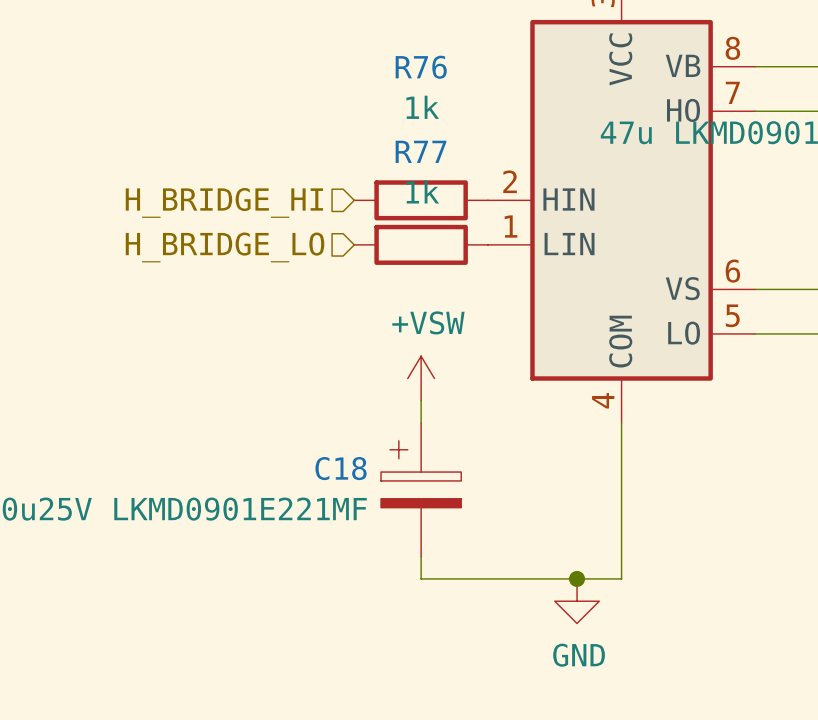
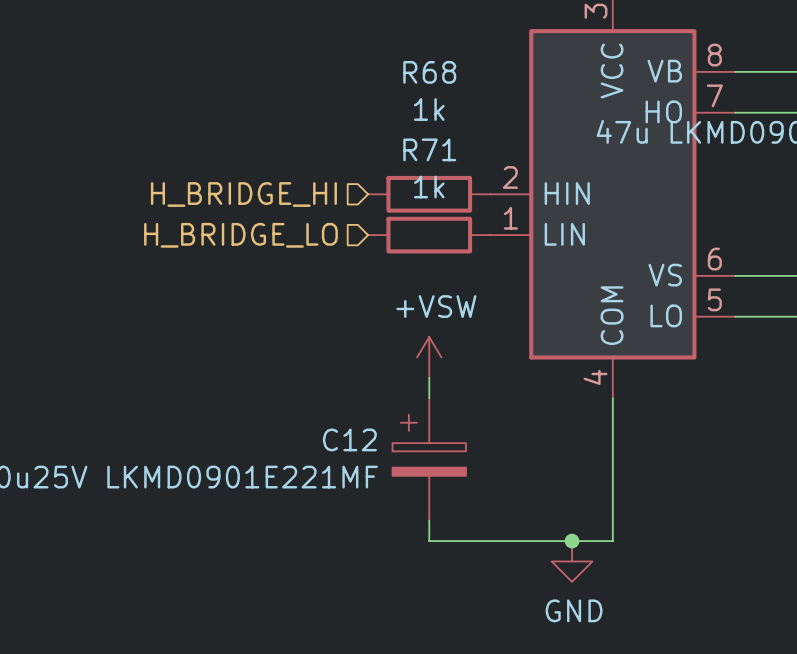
R76 name: R76 (421, 67) -> R68 (429, 72)
R77 name: R77 (421, 151) -> R71 (429, 149)
C18 name: C18 (341, 468) -> C12 (349, 439)

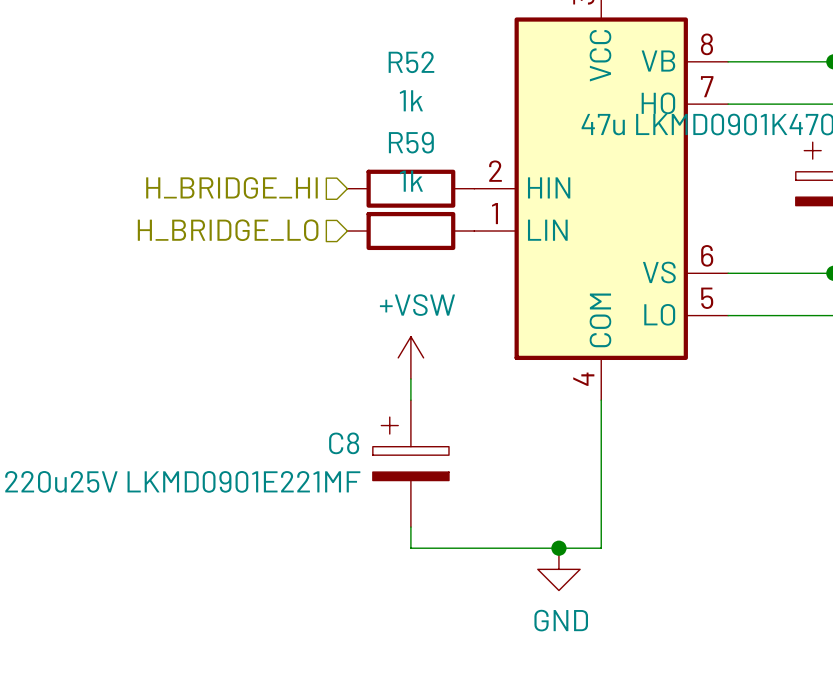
R68 name: R68 (429, 72) -> R52 (411, 62)
R71 name: R71 (429, 149) -> R59 (411, 142)
C12 name: C12 (349, 439) -> C8 (344, 443)

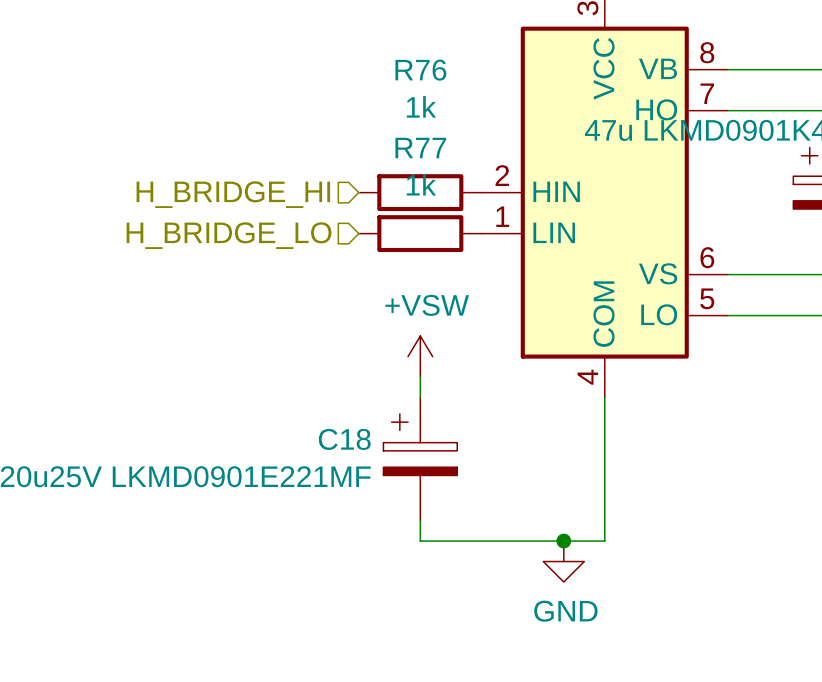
R52 name: R52 (411, 62) -> R76 (420, 70)
R59 name: R59 (411, 142) -> R77 (420, 148)
C8 name: C8 (344, 443) -> C18 (344, 439)

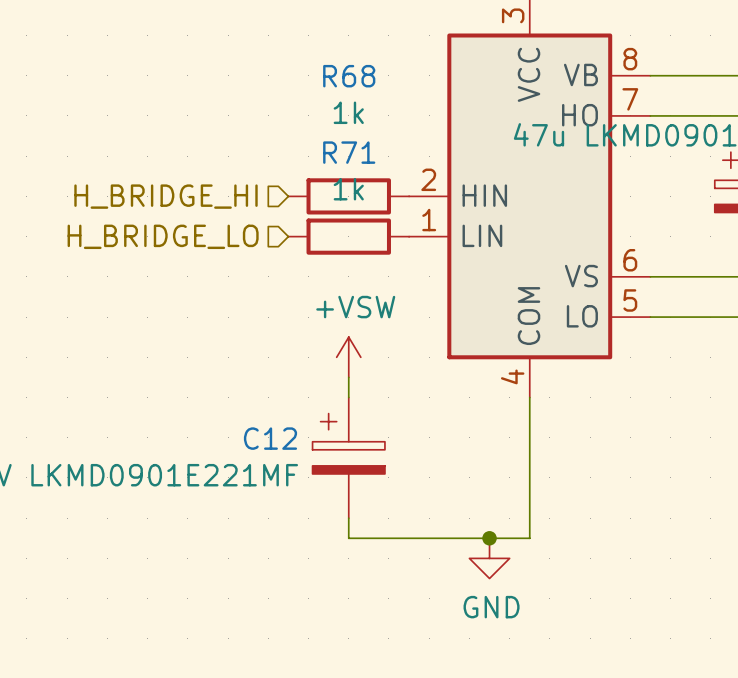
R76 name: R76 (420, 70) -> R68 (349, 76)
R77 name: R77 (420, 148) -> R71 (349, 152)
C18 name: C18 (344, 439) -> C12 (270, 438)

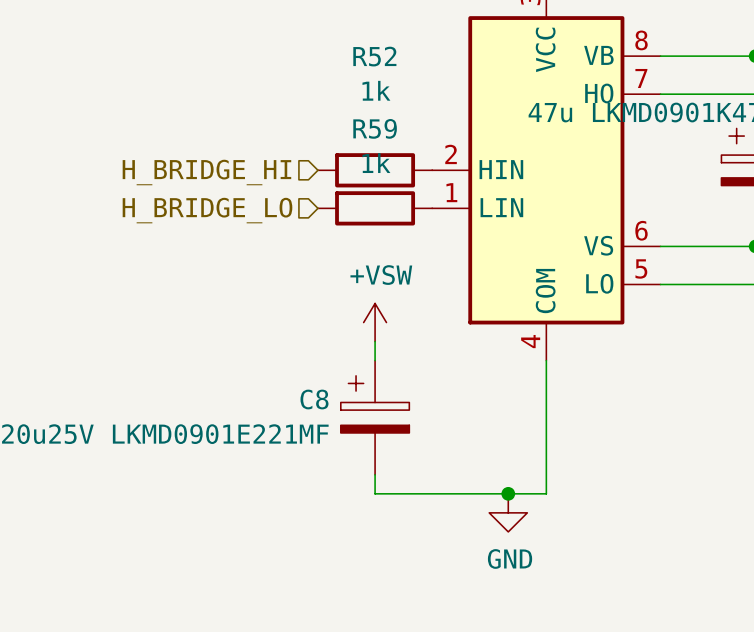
R68 name: R68 (349, 76) -> R52 (374, 56)
R71 name: R71 (349, 152) -> R59 (375, 128)
C12 name: C12 (270, 438) -> C8 (314, 399)

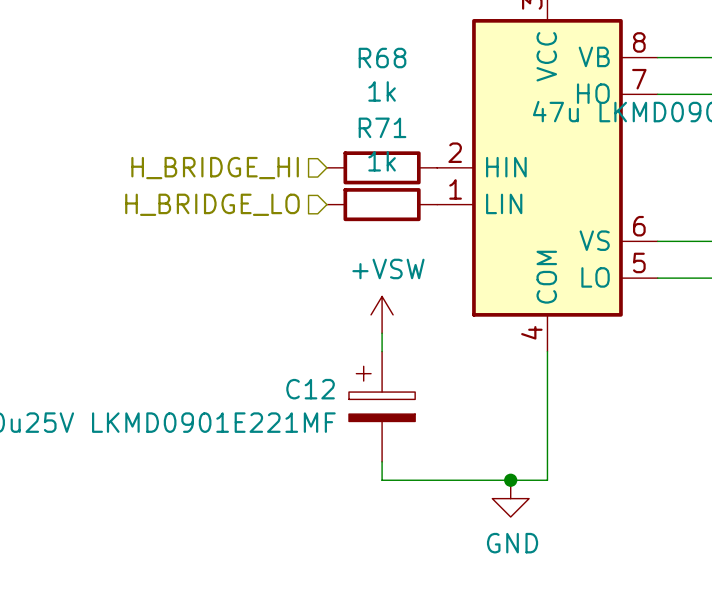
R52 name: R52 (374, 56) -> R68 (382, 58)
R59 name: R59 (375, 128) -> R71 (382, 127)
C8 name: C8 (314, 399) -> C12 (310, 389)

